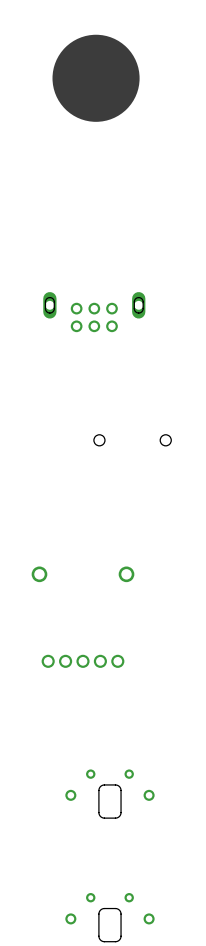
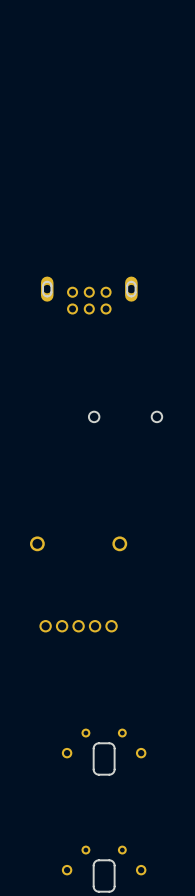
part: (96, 78) -> none

